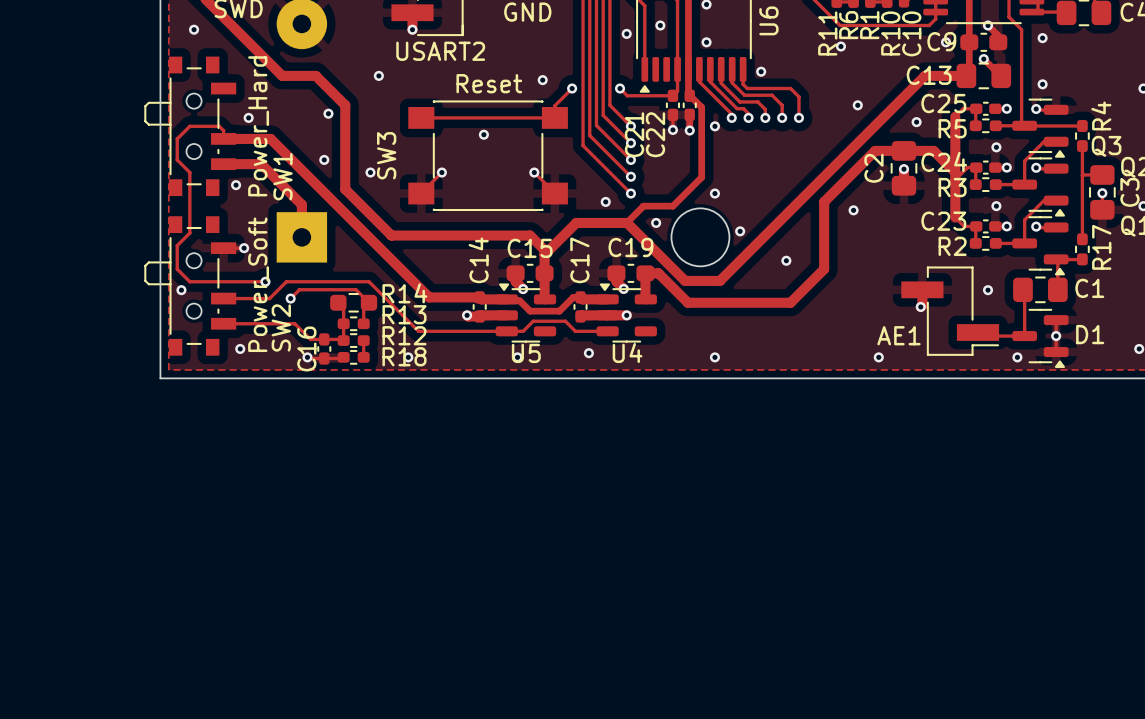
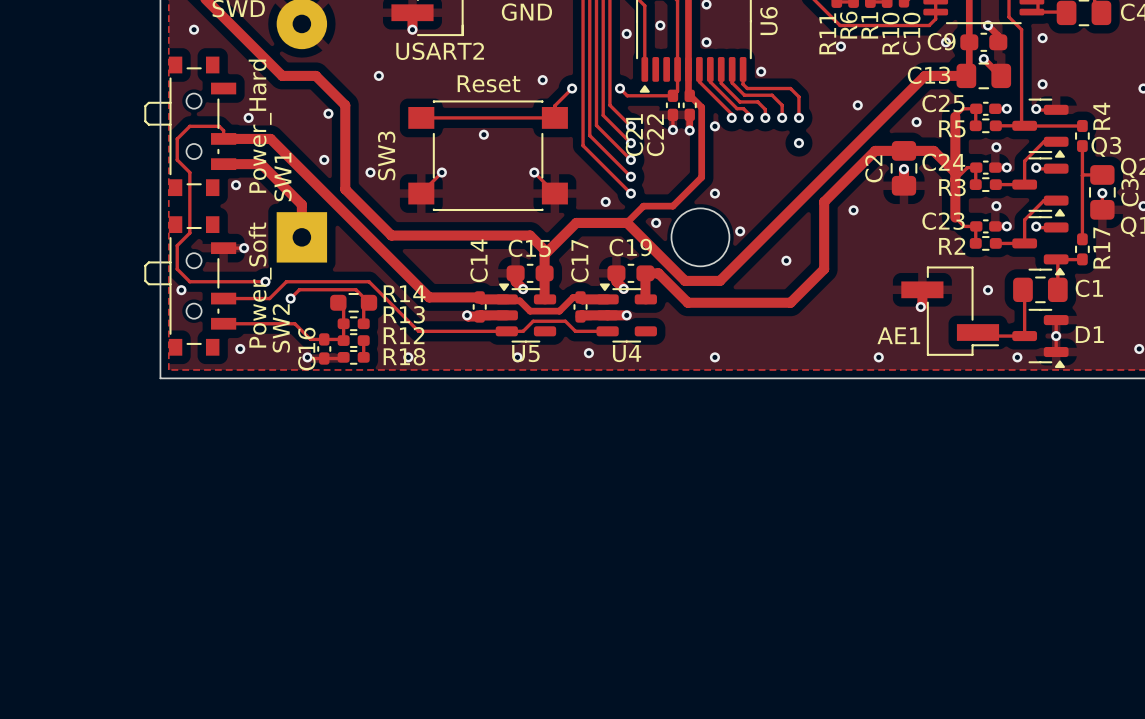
via: none -> (798, 143)

